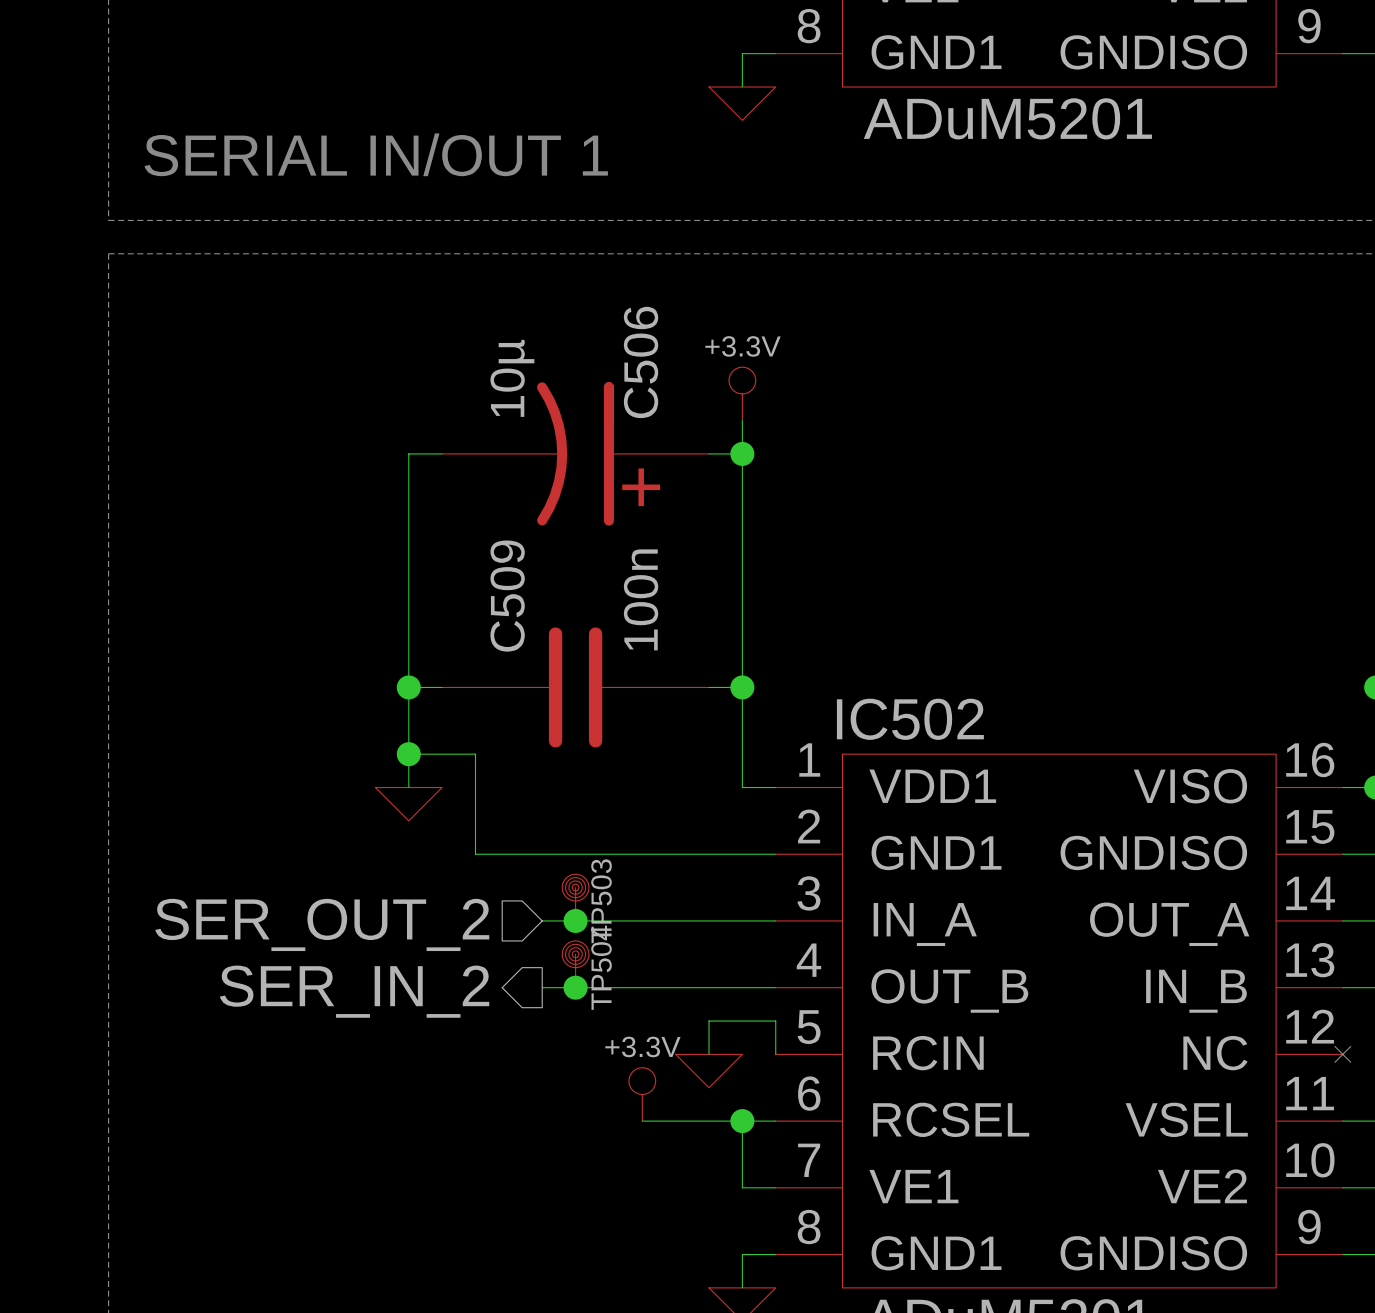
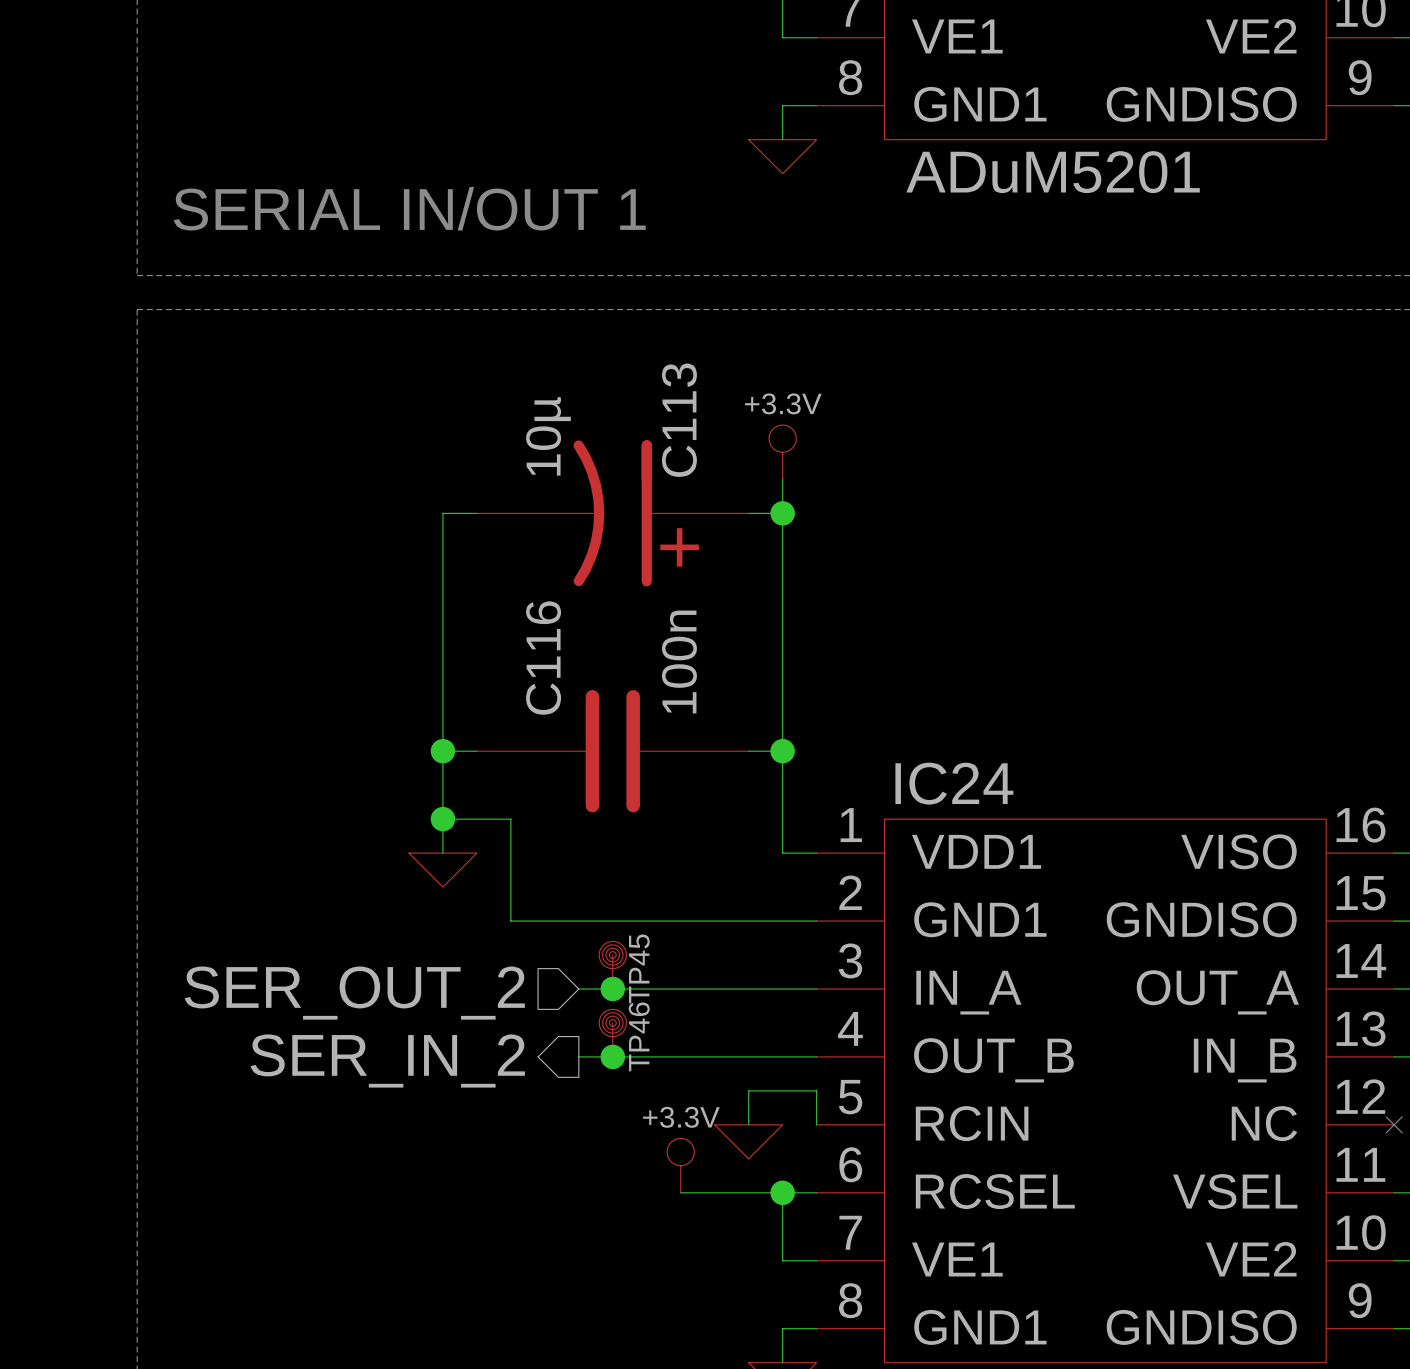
C506 name: C506 (641, 362) -> C113 (679, 420)
C509 name: C509 (507, 596) -> C116 (543, 658)
IC502 name: IC502 (910, 719) -> IC24 (954, 783)
TP503 name: TP503 (601, 901) -> TP45 (639, 968)
TP504 name: TP504 (601, 967) -> TP46 (639, 1036)

